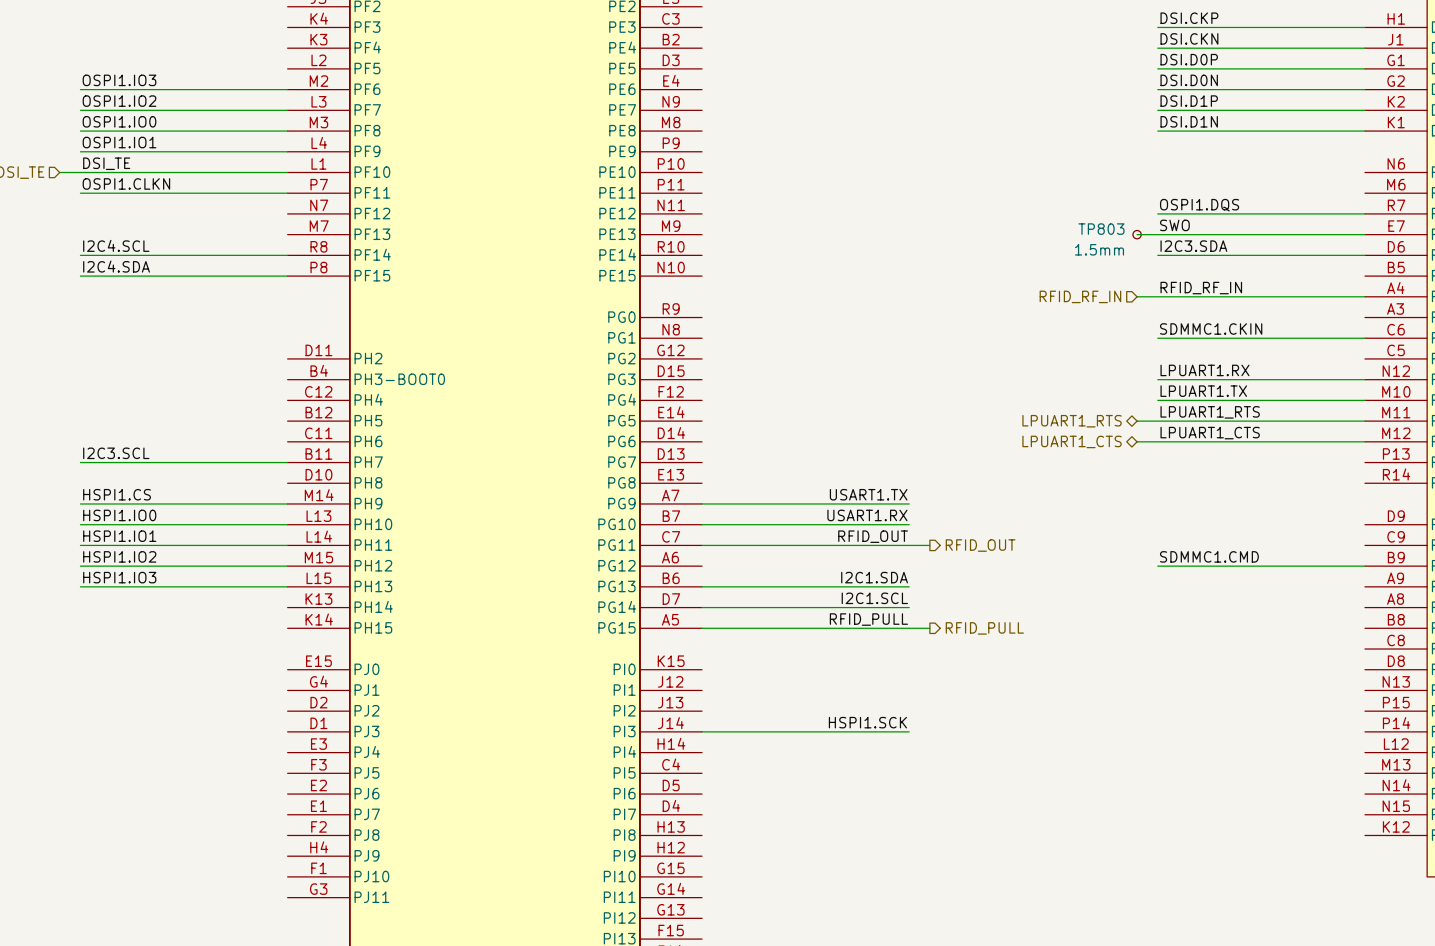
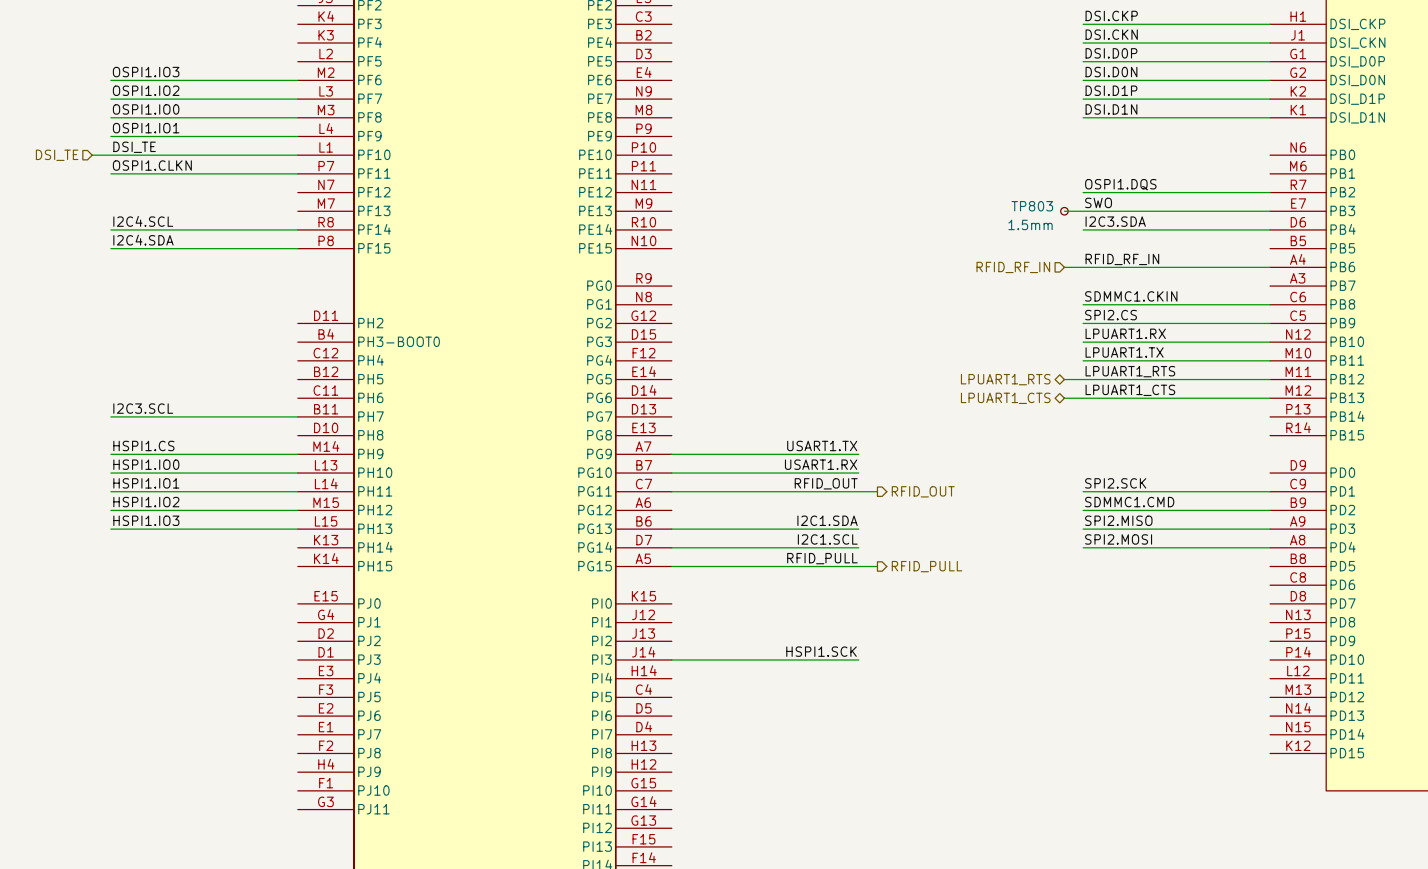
label: none -> SPI2.CS (1111, 315)
wire: none -> (1083, 323) (1270, 323)
label: none -> SPI2.SCK (1115, 483)
wire: none -> (1083, 491) (1270, 491)
label: none -> SPI2.MISO (1118, 520)
wire: none -> (1083, 529) (1270, 529)
label: none -> SPI2.MOSI (1118, 539)
wire: none -> (1083, 547) (1270, 547)

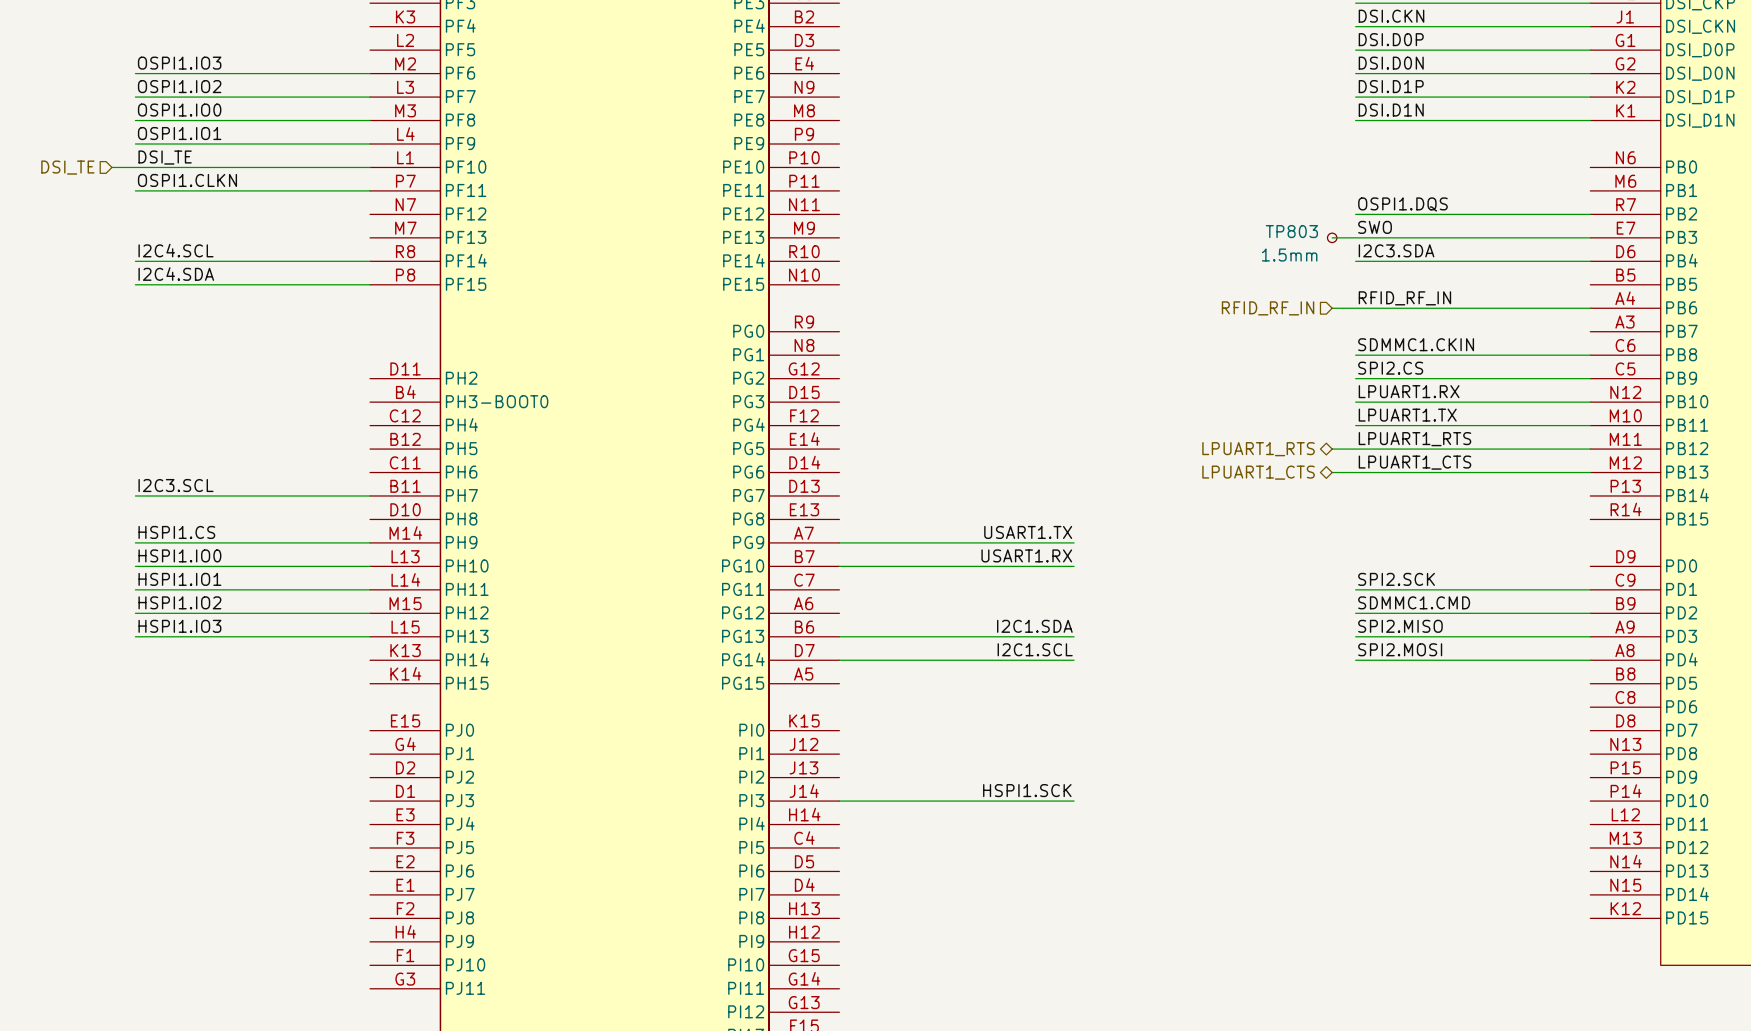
label: RFID_OUT (826, 483) -> none
wire: (671, 491) (877, 491) -> none
hierarchical label: RFID_OUT (923, 491) -> none
label: RFID_PULL (822, 558) -> none
wire: (671, 566) (877, 566) -> none
hierarchical label: RFID_PULL (927, 566) -> none

